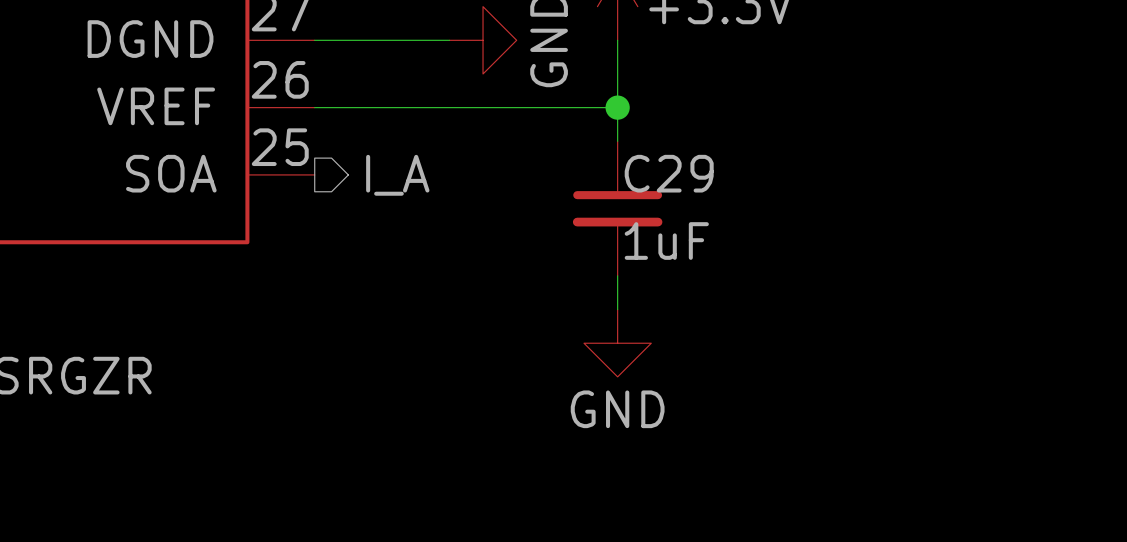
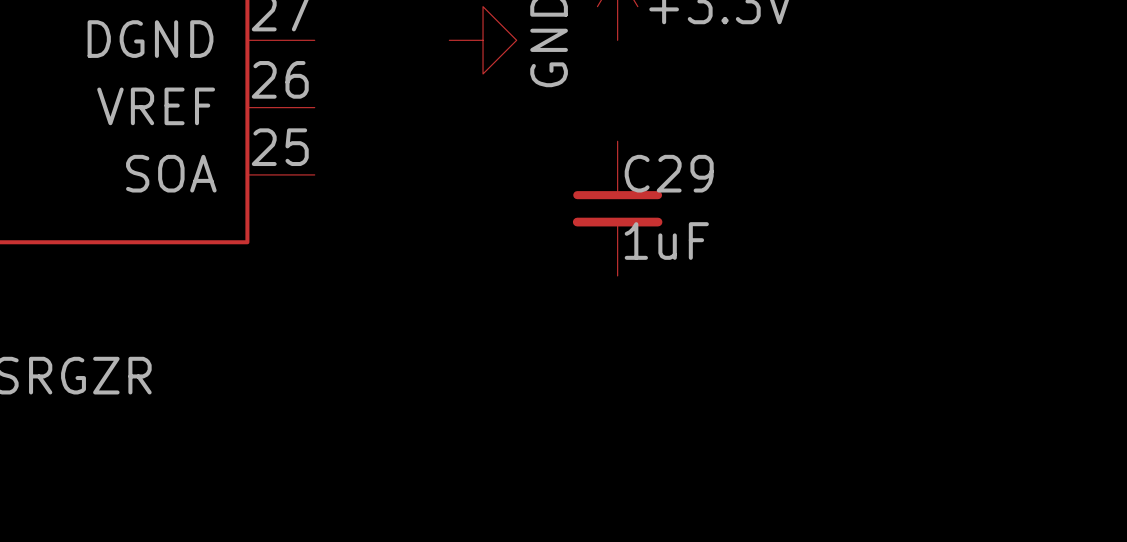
wire: (314, 40) (449, 40) -> none
wire: (617, 40) (617, 141) -> none
wire: (314, 107) (617, 107) -> none
junction: (617, 107) -> none
hierarchical label: I_A (397, 175) -> none
wire: (617, 275) (617, 309) -> none
power symbol: GND (617, 343) -> none

